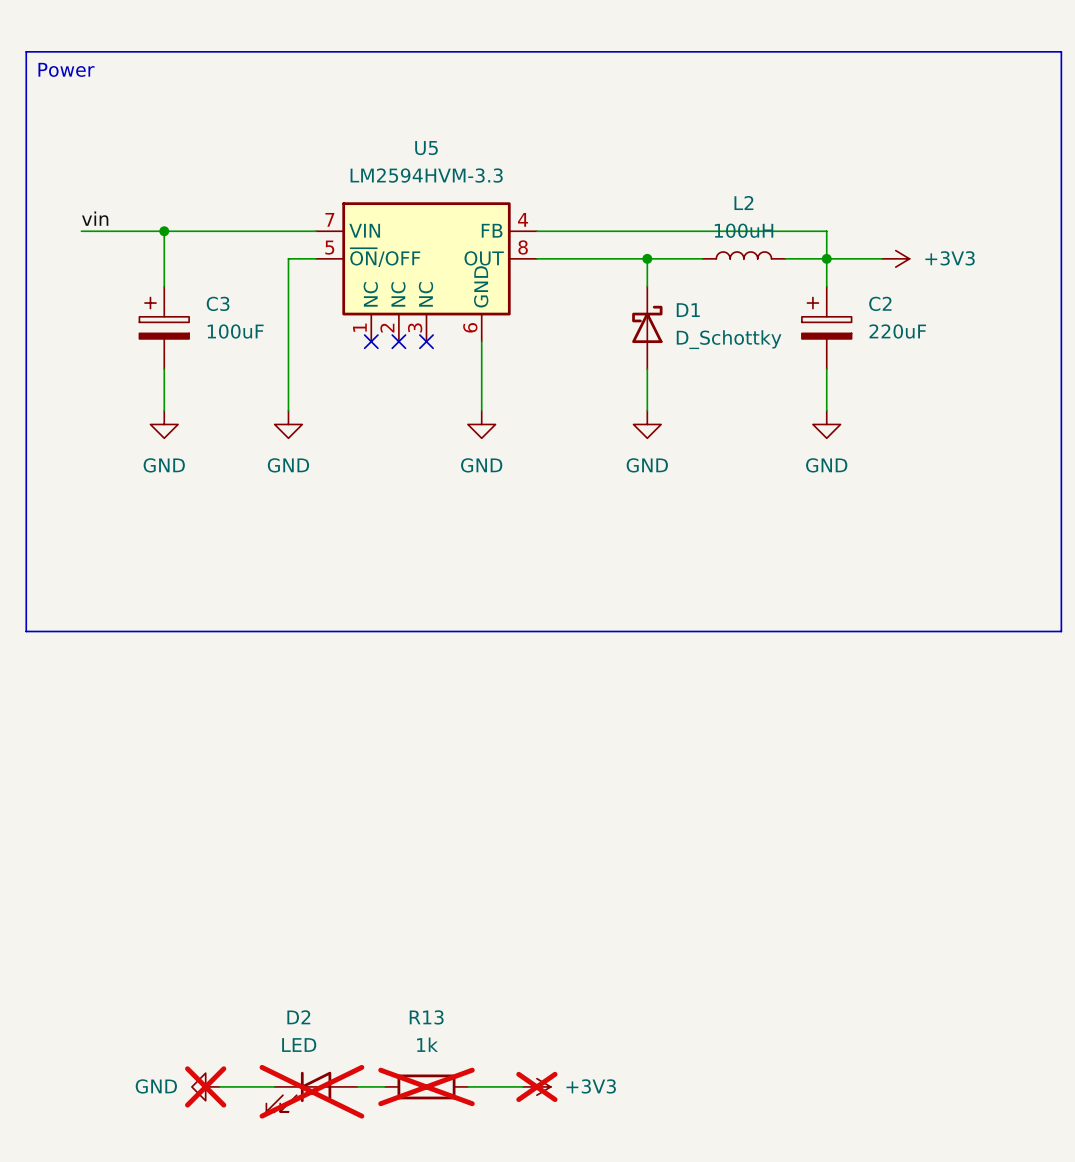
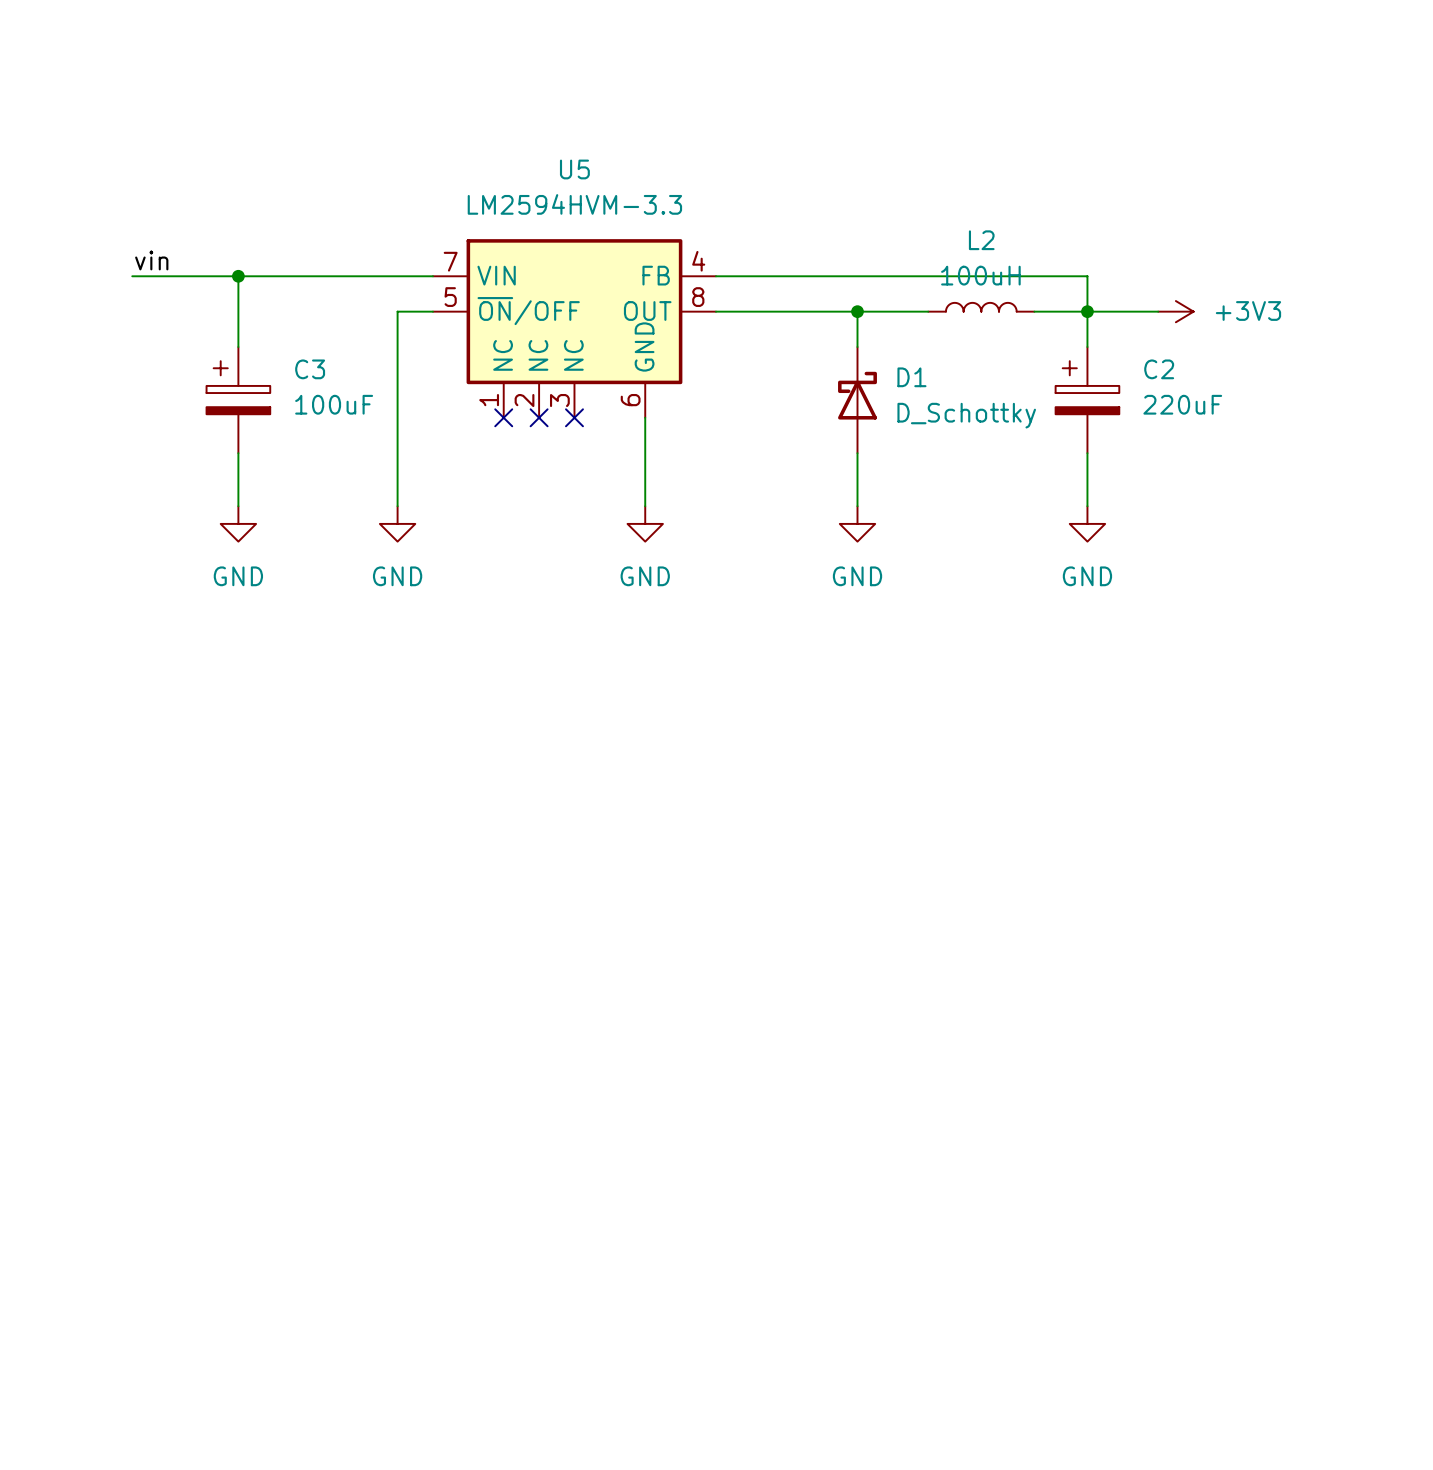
line: (26, 51) (1061, 51) (1061, 631) (26, 631) (26, 51) -> none
text: Power (66, 69) -> none
power symbol: GND (205, 1086) -> none
wire: (219, 1086) (274, 1086) -> none
wire: (357, 1086) (385, 1086) -> none
R13: 1k (426, 1086) -> none
wire: (467, 1086) (523, 1086) -> none
power symbol: +3V3 (536, 1086) -> none
D2: LED (311, 1091) -> none

